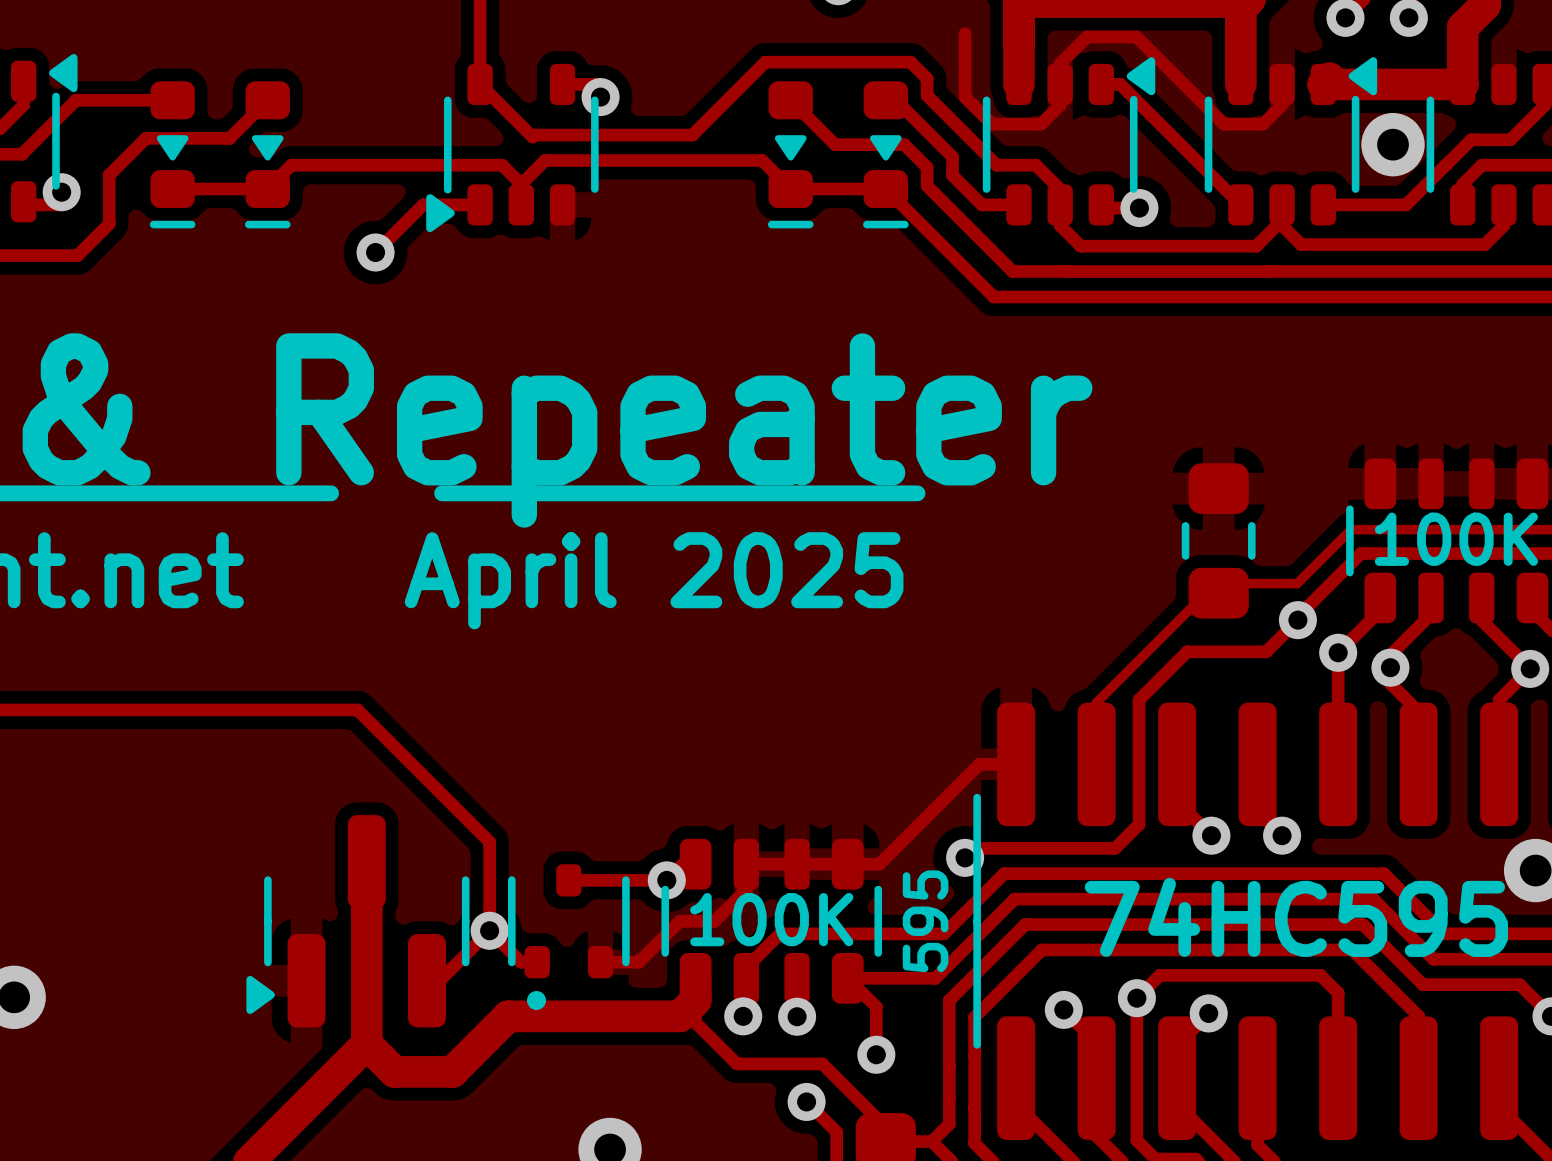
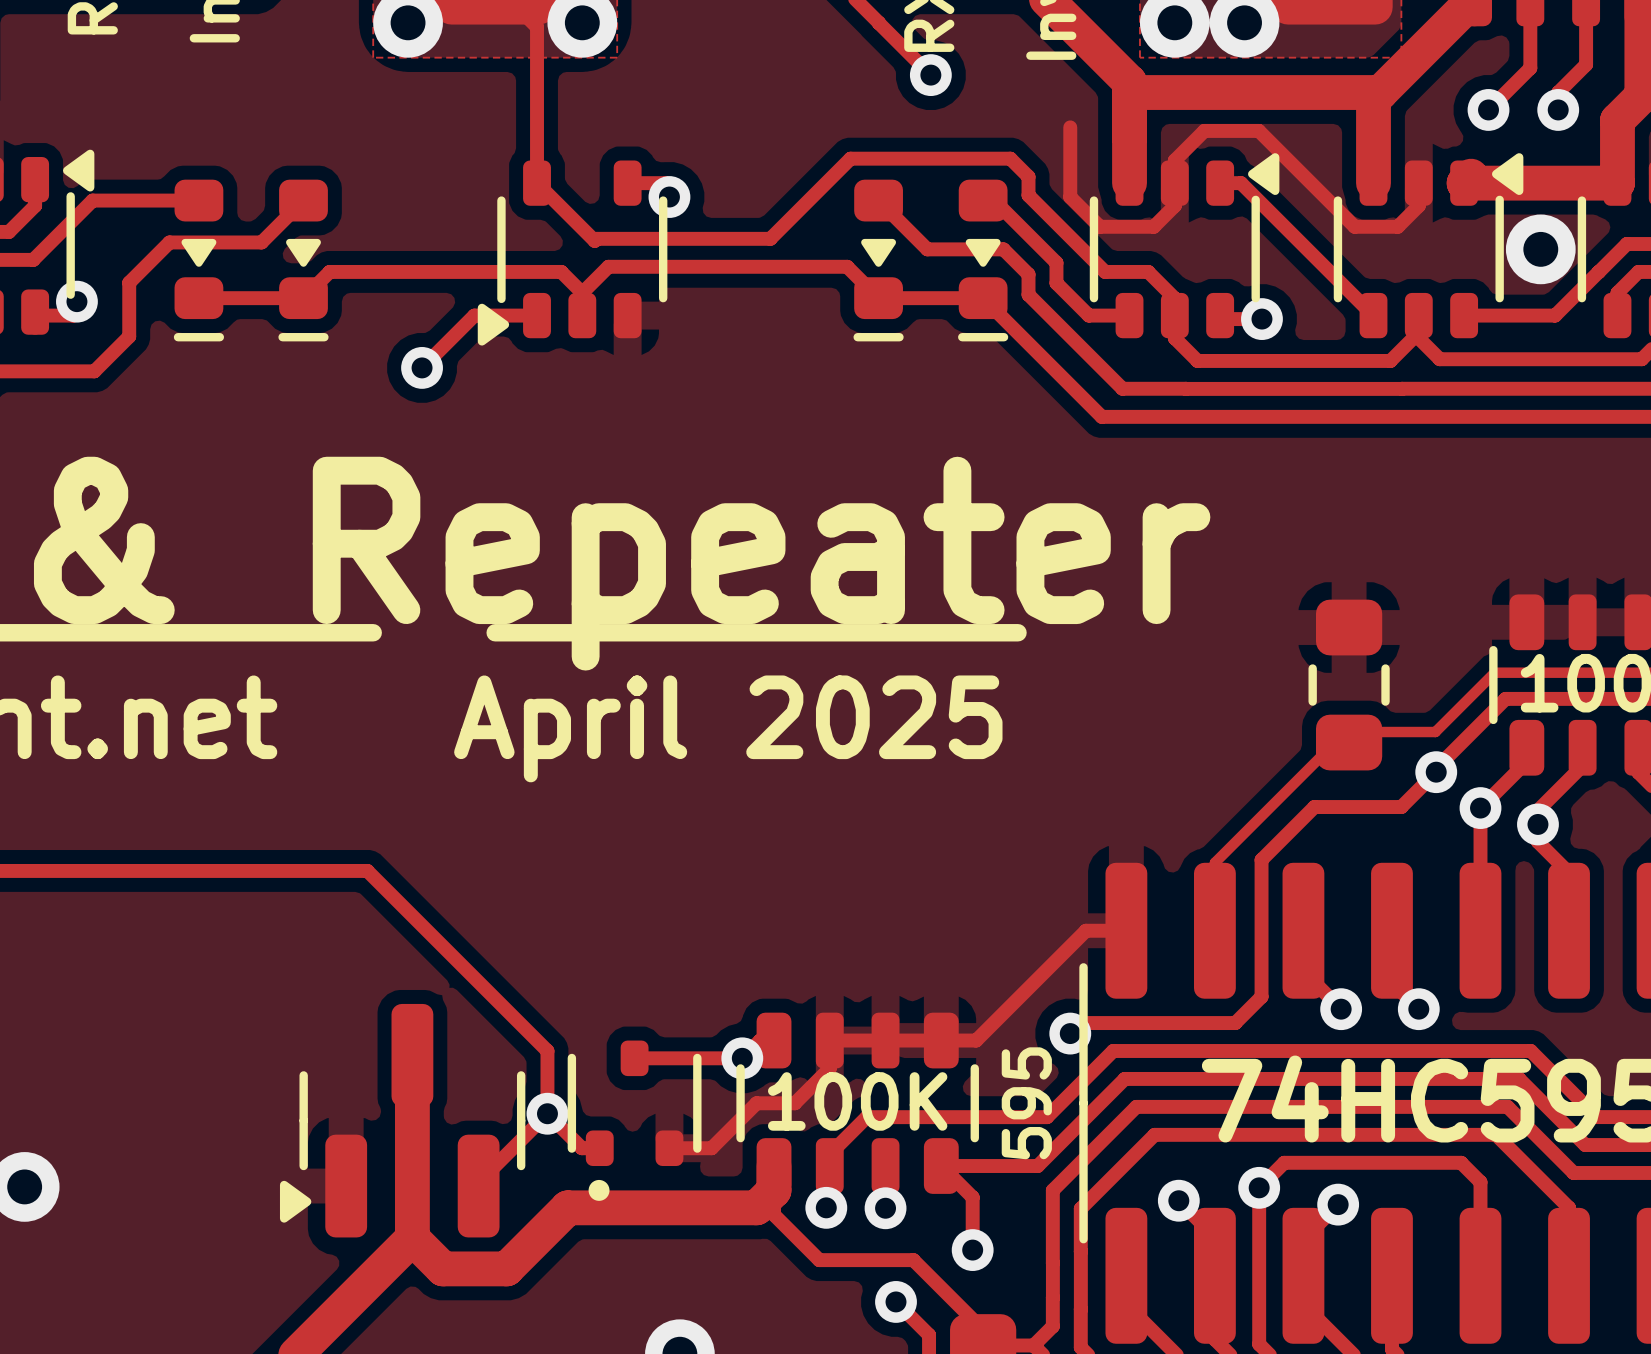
track: (325, 709) (357, 709) (489, 842) (489, 873) -> (367, 870) (547, 1050)
part position: (357, 921) -> (402, 1120)

